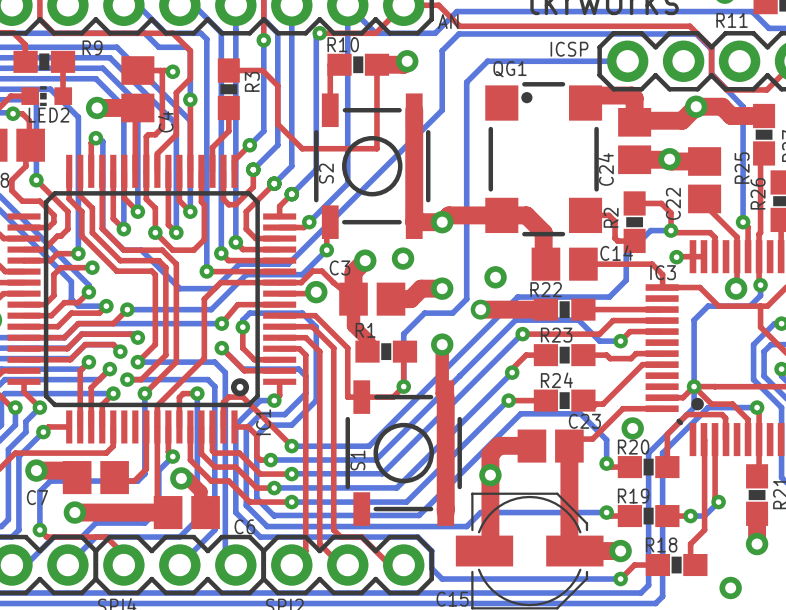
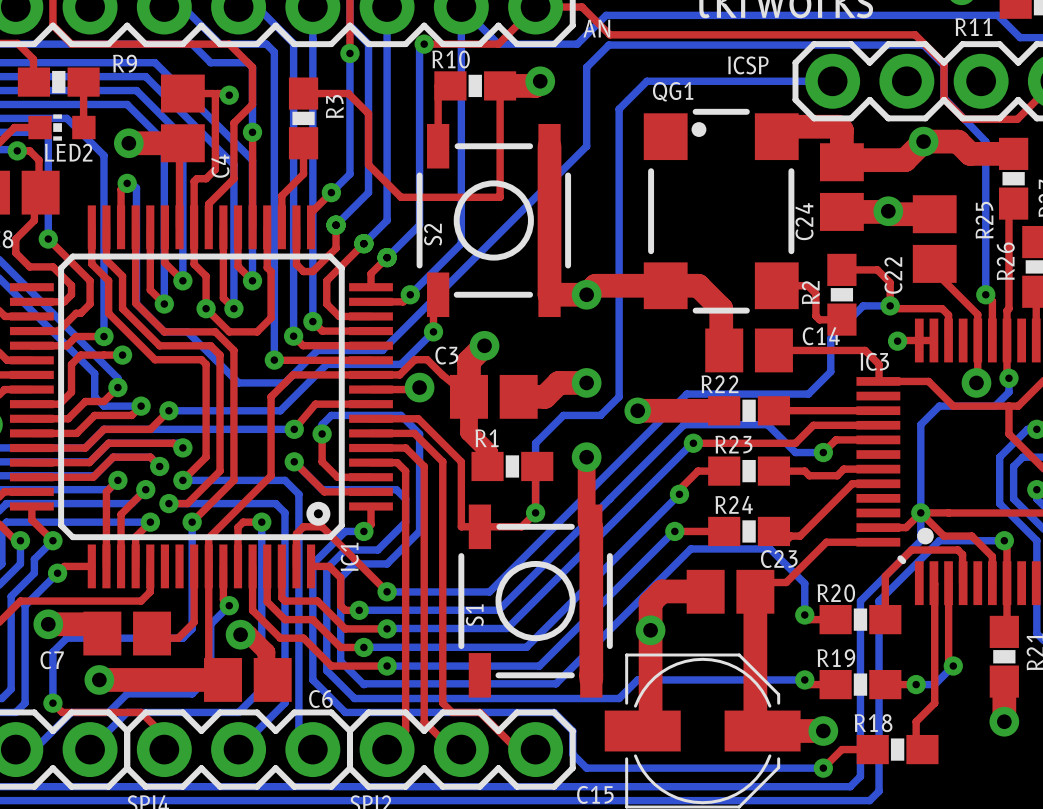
via: (403, 258) -> none
via: (495, 277) -> none
via: (632, 428) -> none
via: (730, 587) -> none

